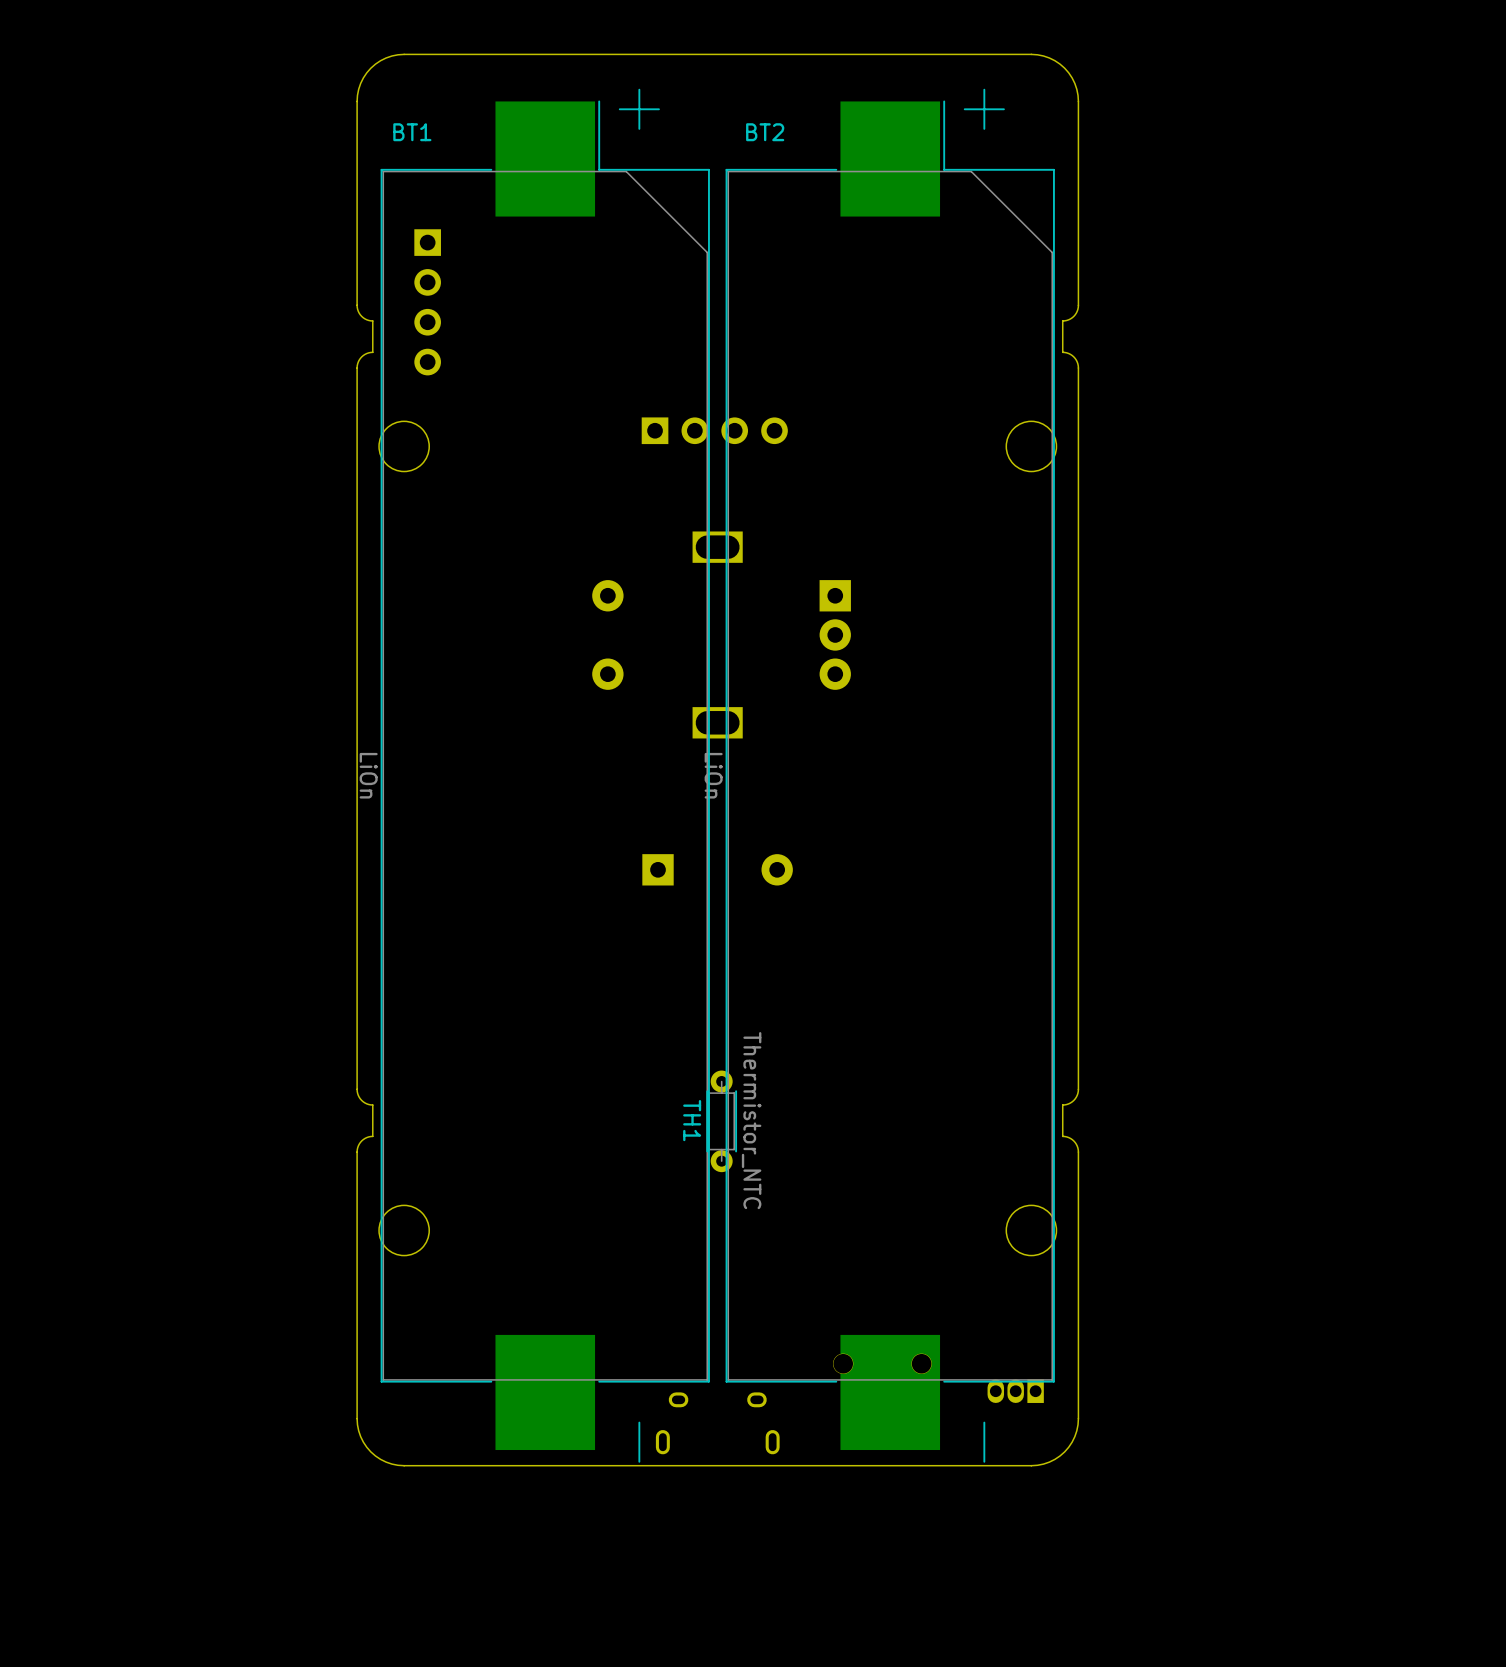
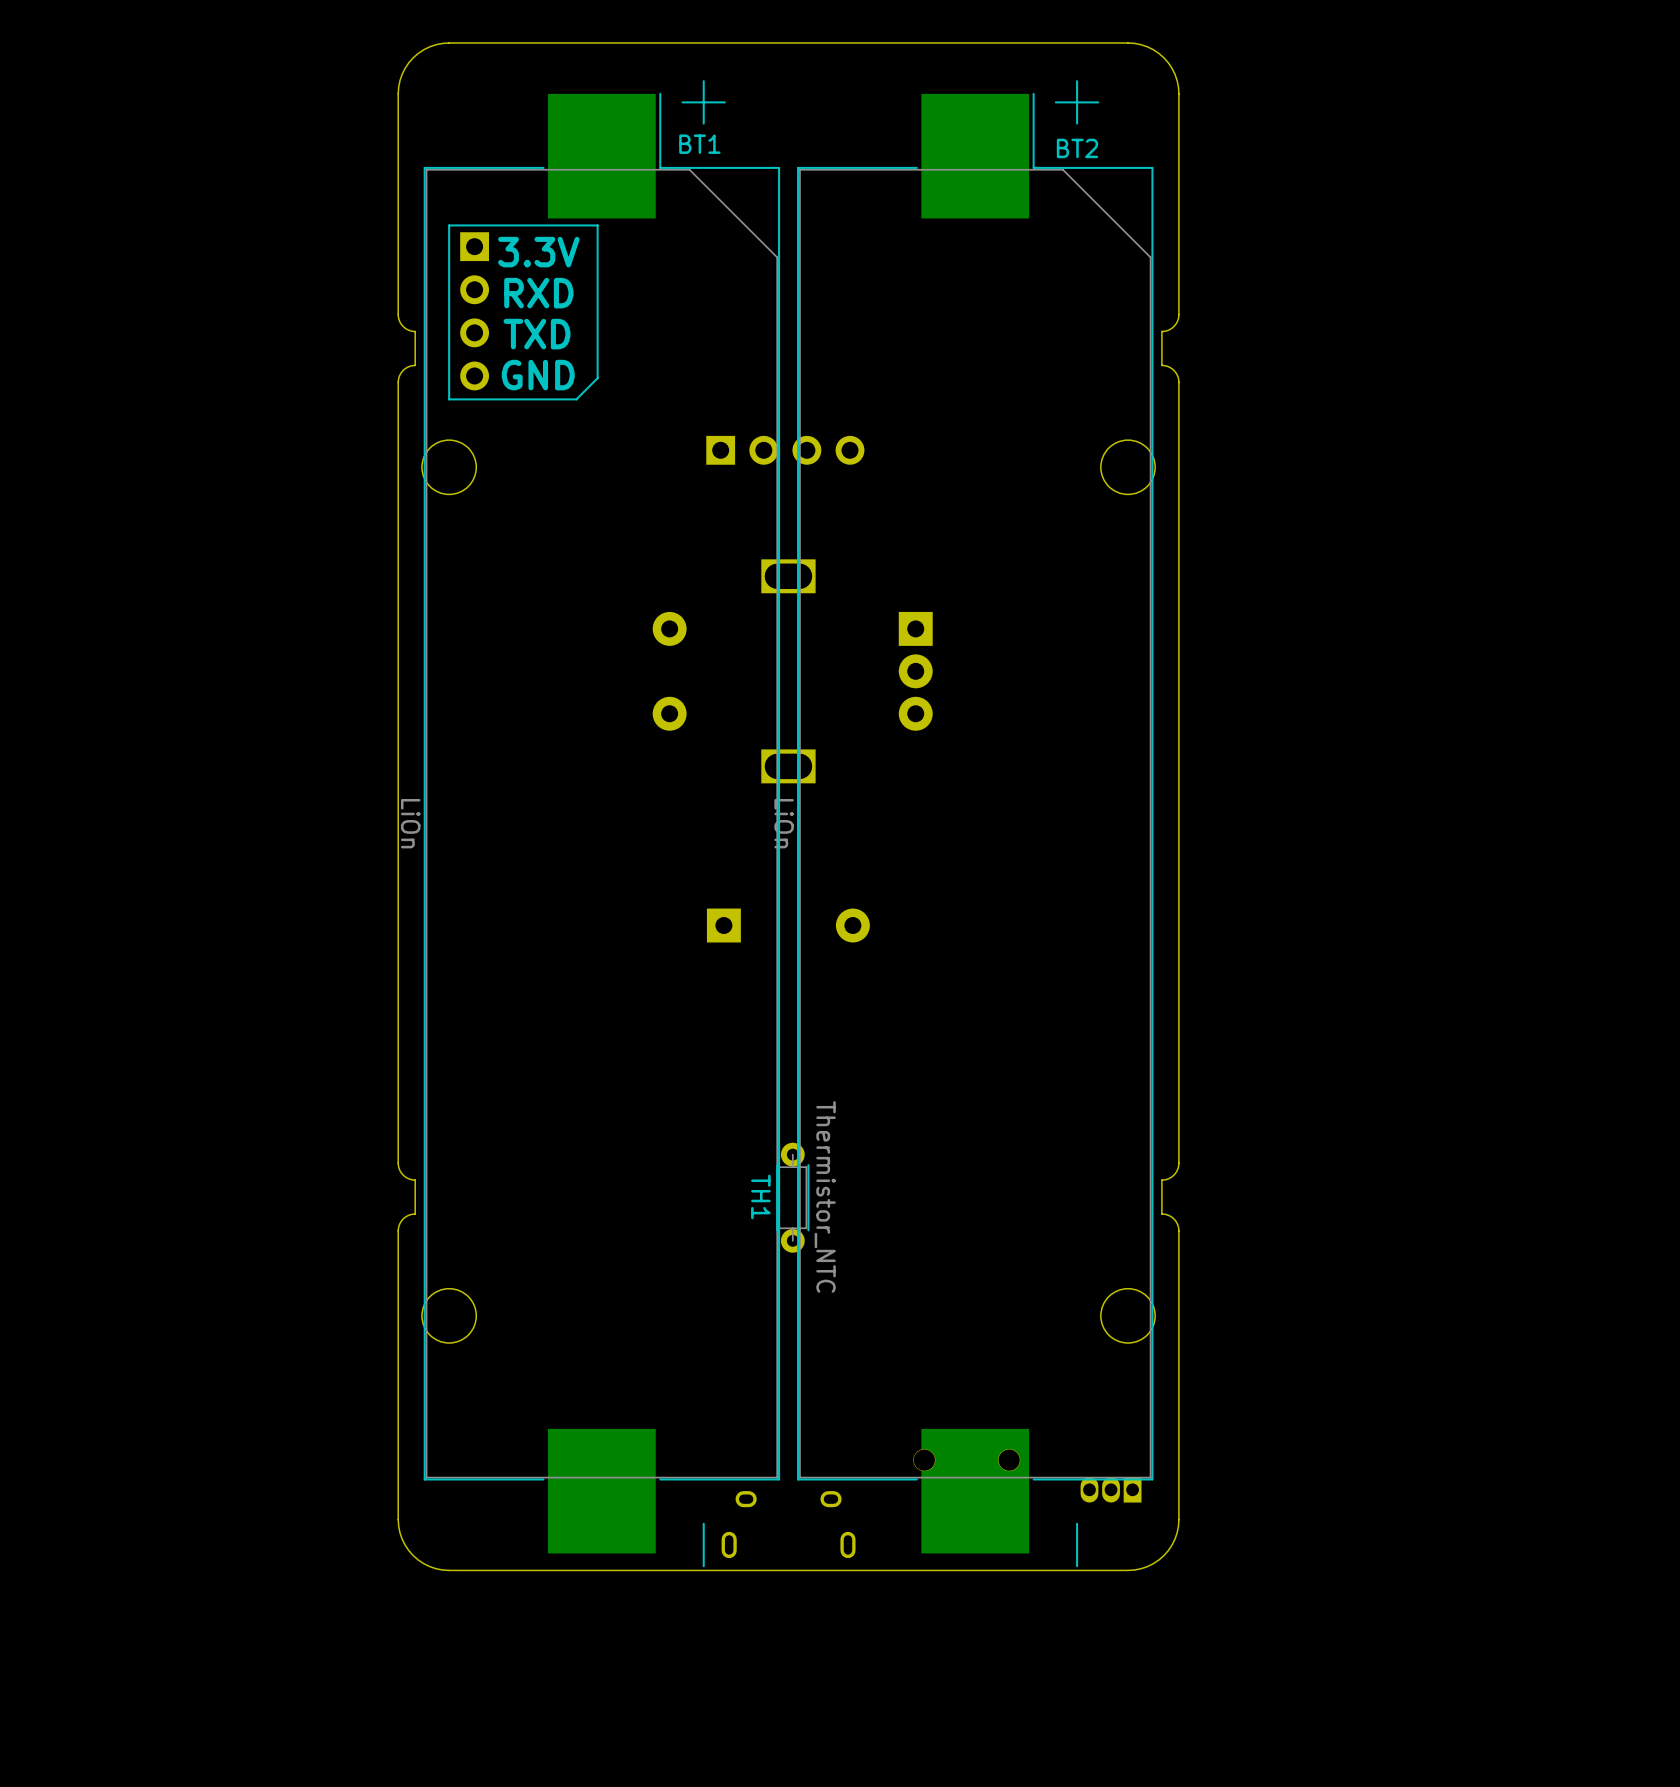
BT1 name position: BT1 (412, 132) -> BT1 (699, 144)
BT2 name position: BT2 (765, 132) -> BT2 (1077, 148)
line: none -> (597, 225) (597, 378) (576, 399) (449, 399) (449, 225) (597, 225)
text: none -> 3.3V (538, 252)
text: none -> RXD (538, 293)
text: none -> TXD (537, 334)
text: none -> GND (538, 375)

